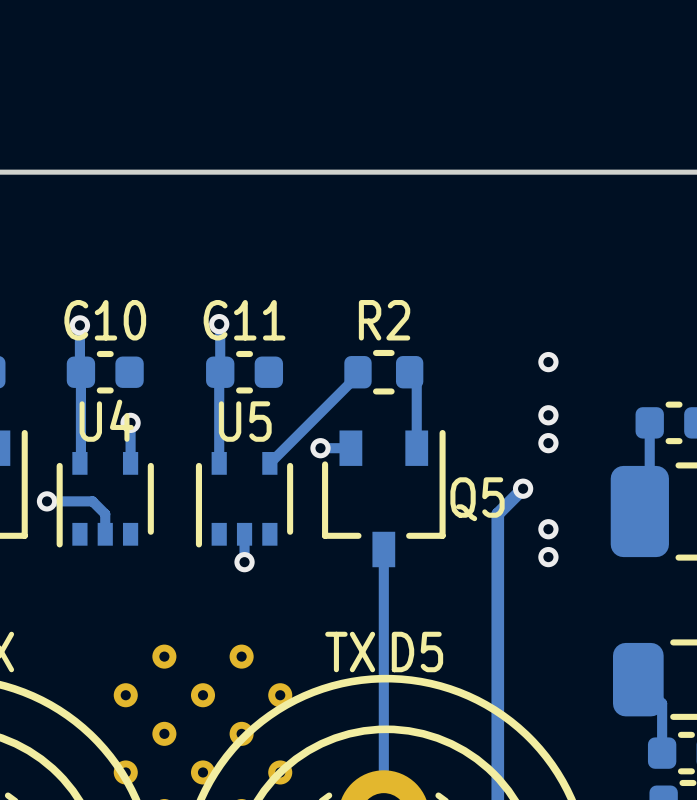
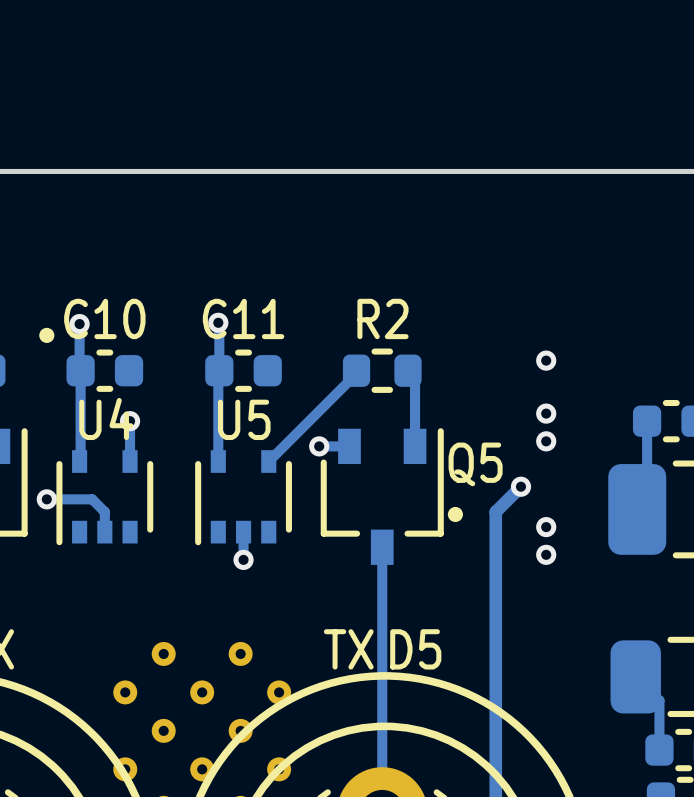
drawing: none -> [39, 327, 55, 343]
Q5 name position: Q5 (477, 499) -> Q5 (475, 464)
drawing: none -> [447, 506, 463, 523]

